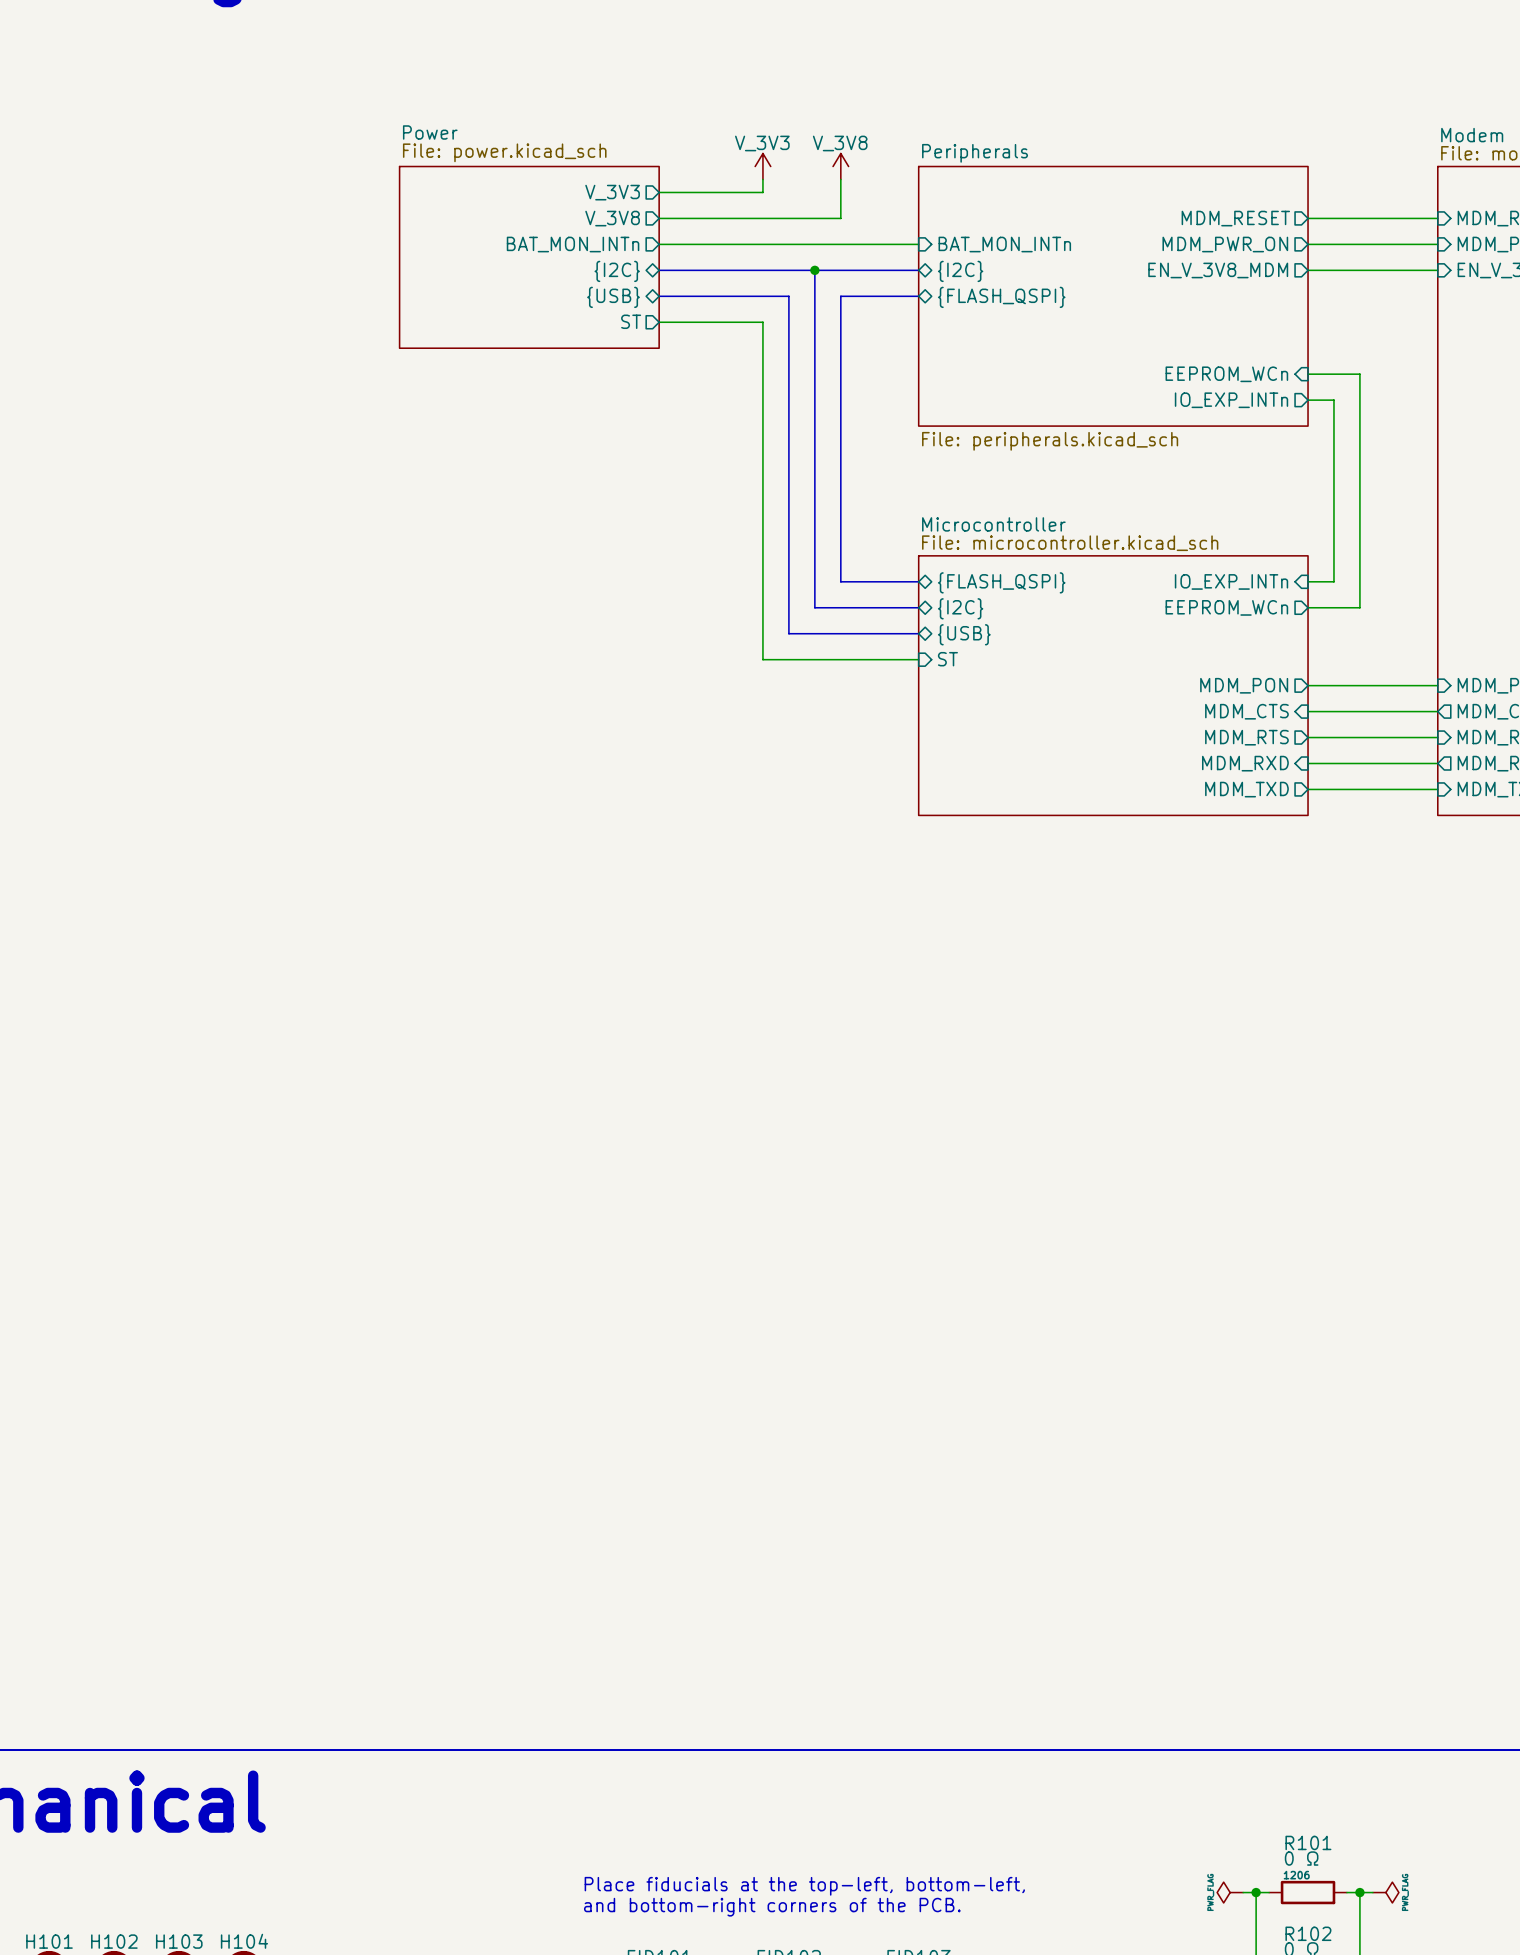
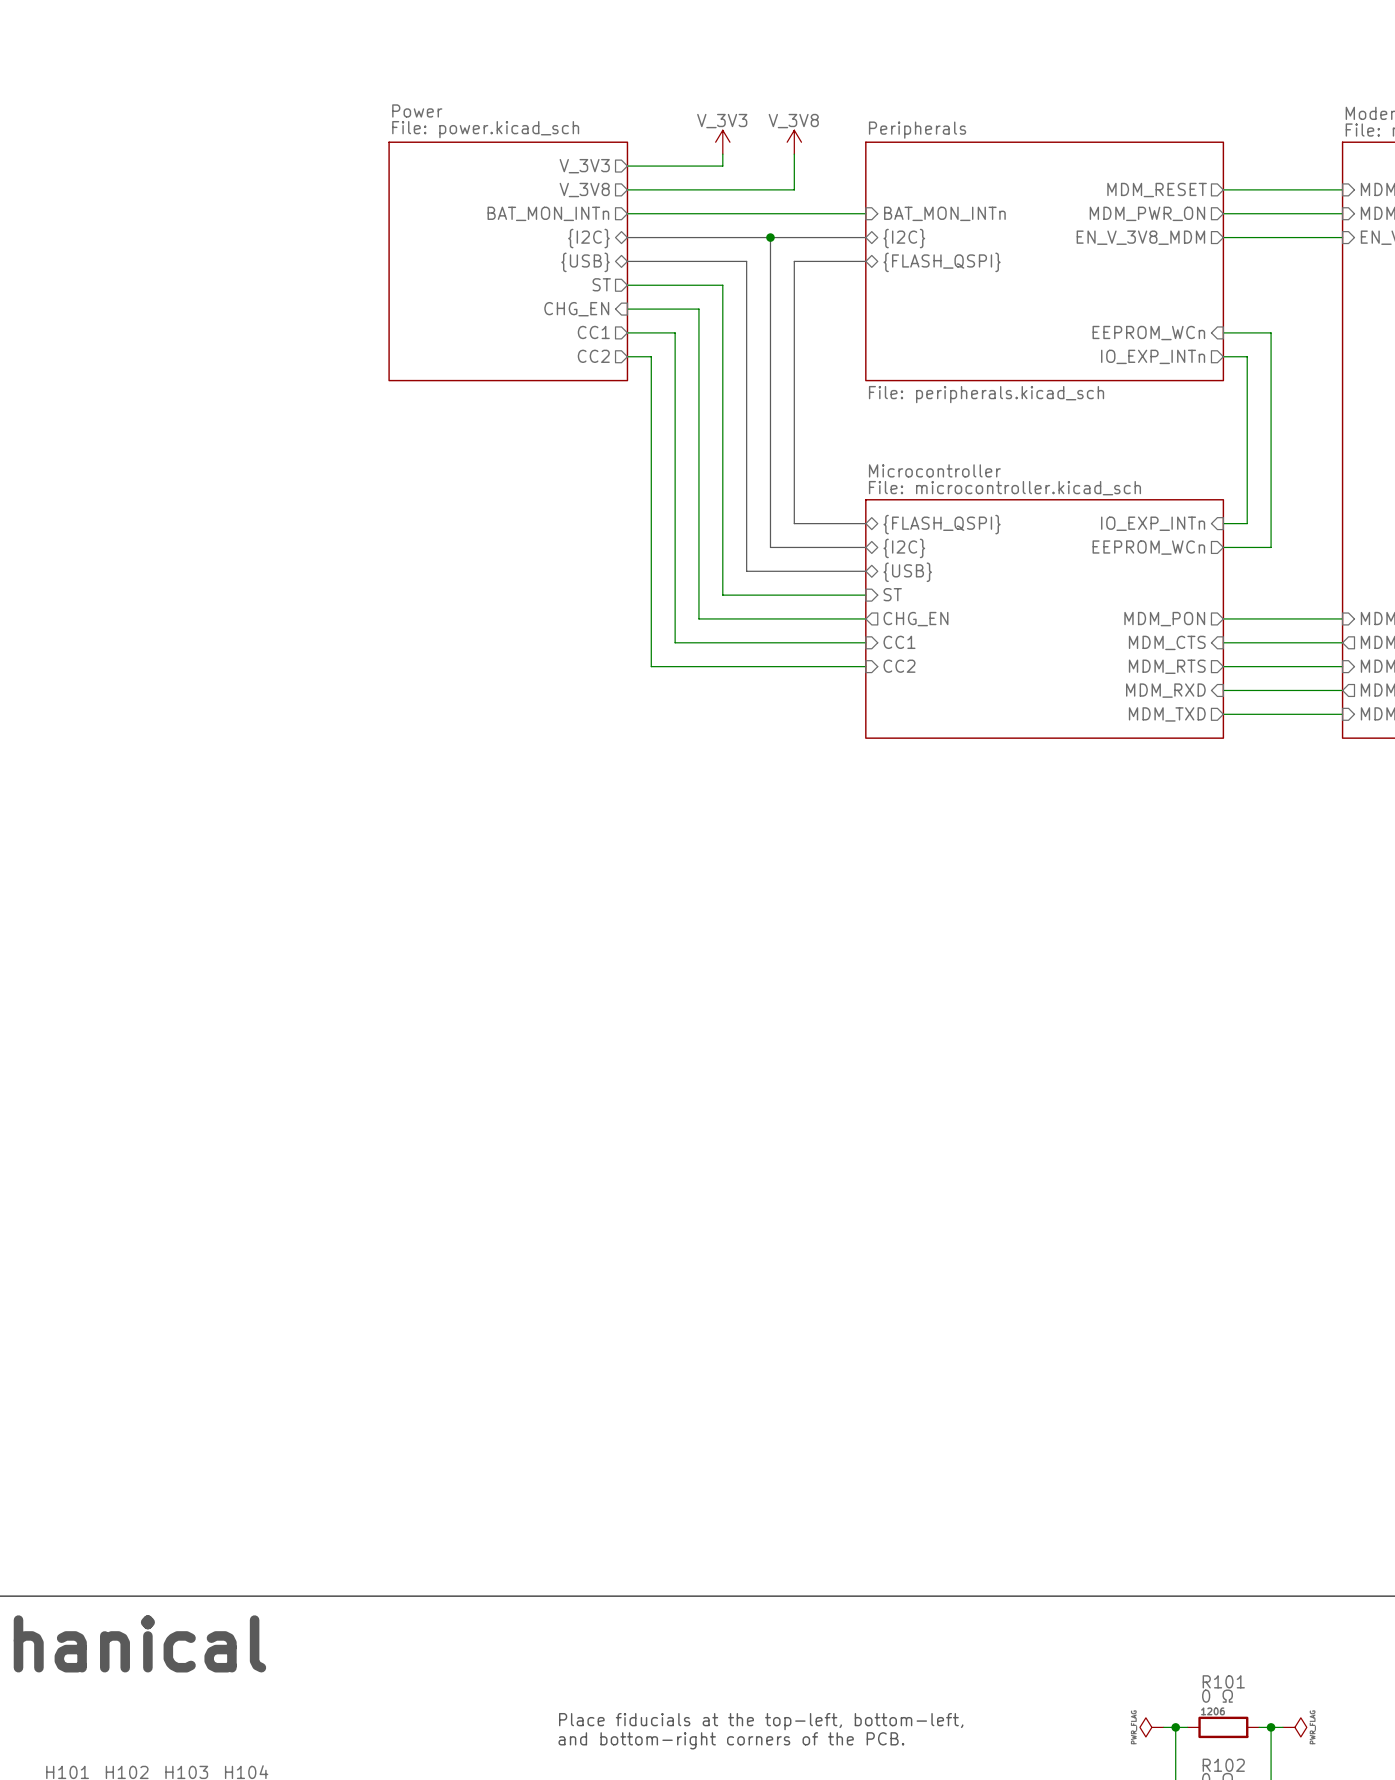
sheet Power: File: power.kicad_sch (529, 257) -> none
sheet Power: none -> File: power.kicad_sch (508, 261)
sheet pin: none -> CHG_EN (576, 309)
wire: none -> (627, 309) (698, 309) (698, 618) (865, 618)
sheet pin: none -> CC1 (593, 332)
wire: none -> (627, 332) (675, 332) (675, 642) (865, 642)
sheet pin: none -> CC2 (593, 356)
wire: none -> (627, 356) (651, 356) (651, 666) (865, 666)
sheet pin: none -> CHG_EN (915, 619)
sheet pin: none -> CC1 (899, 642)
sheet pin: none -> CC2 (899, 666)

